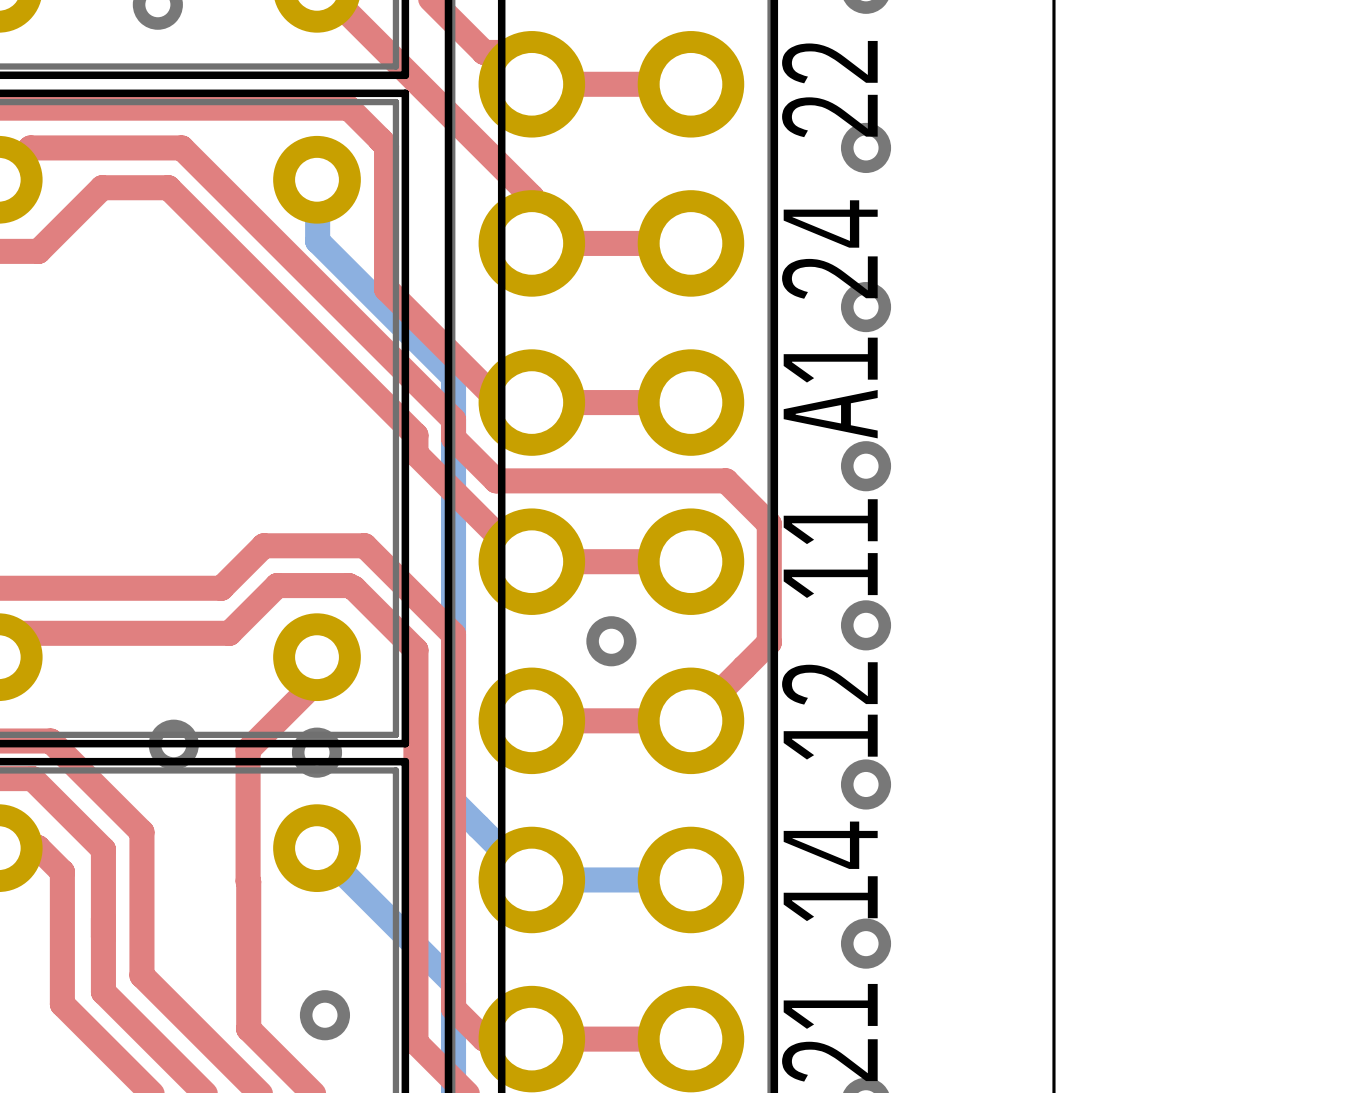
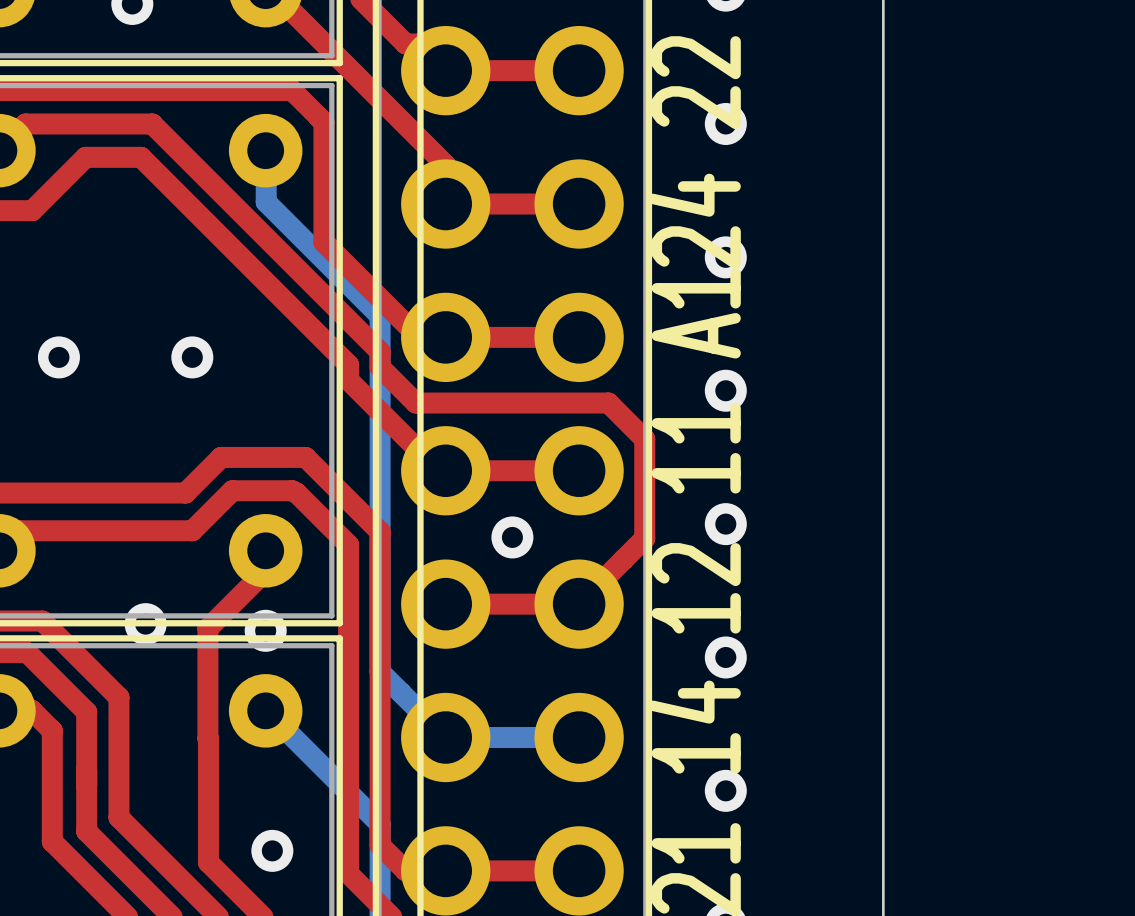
via: none -> (58, 357)
via: none -> (192, 357)

